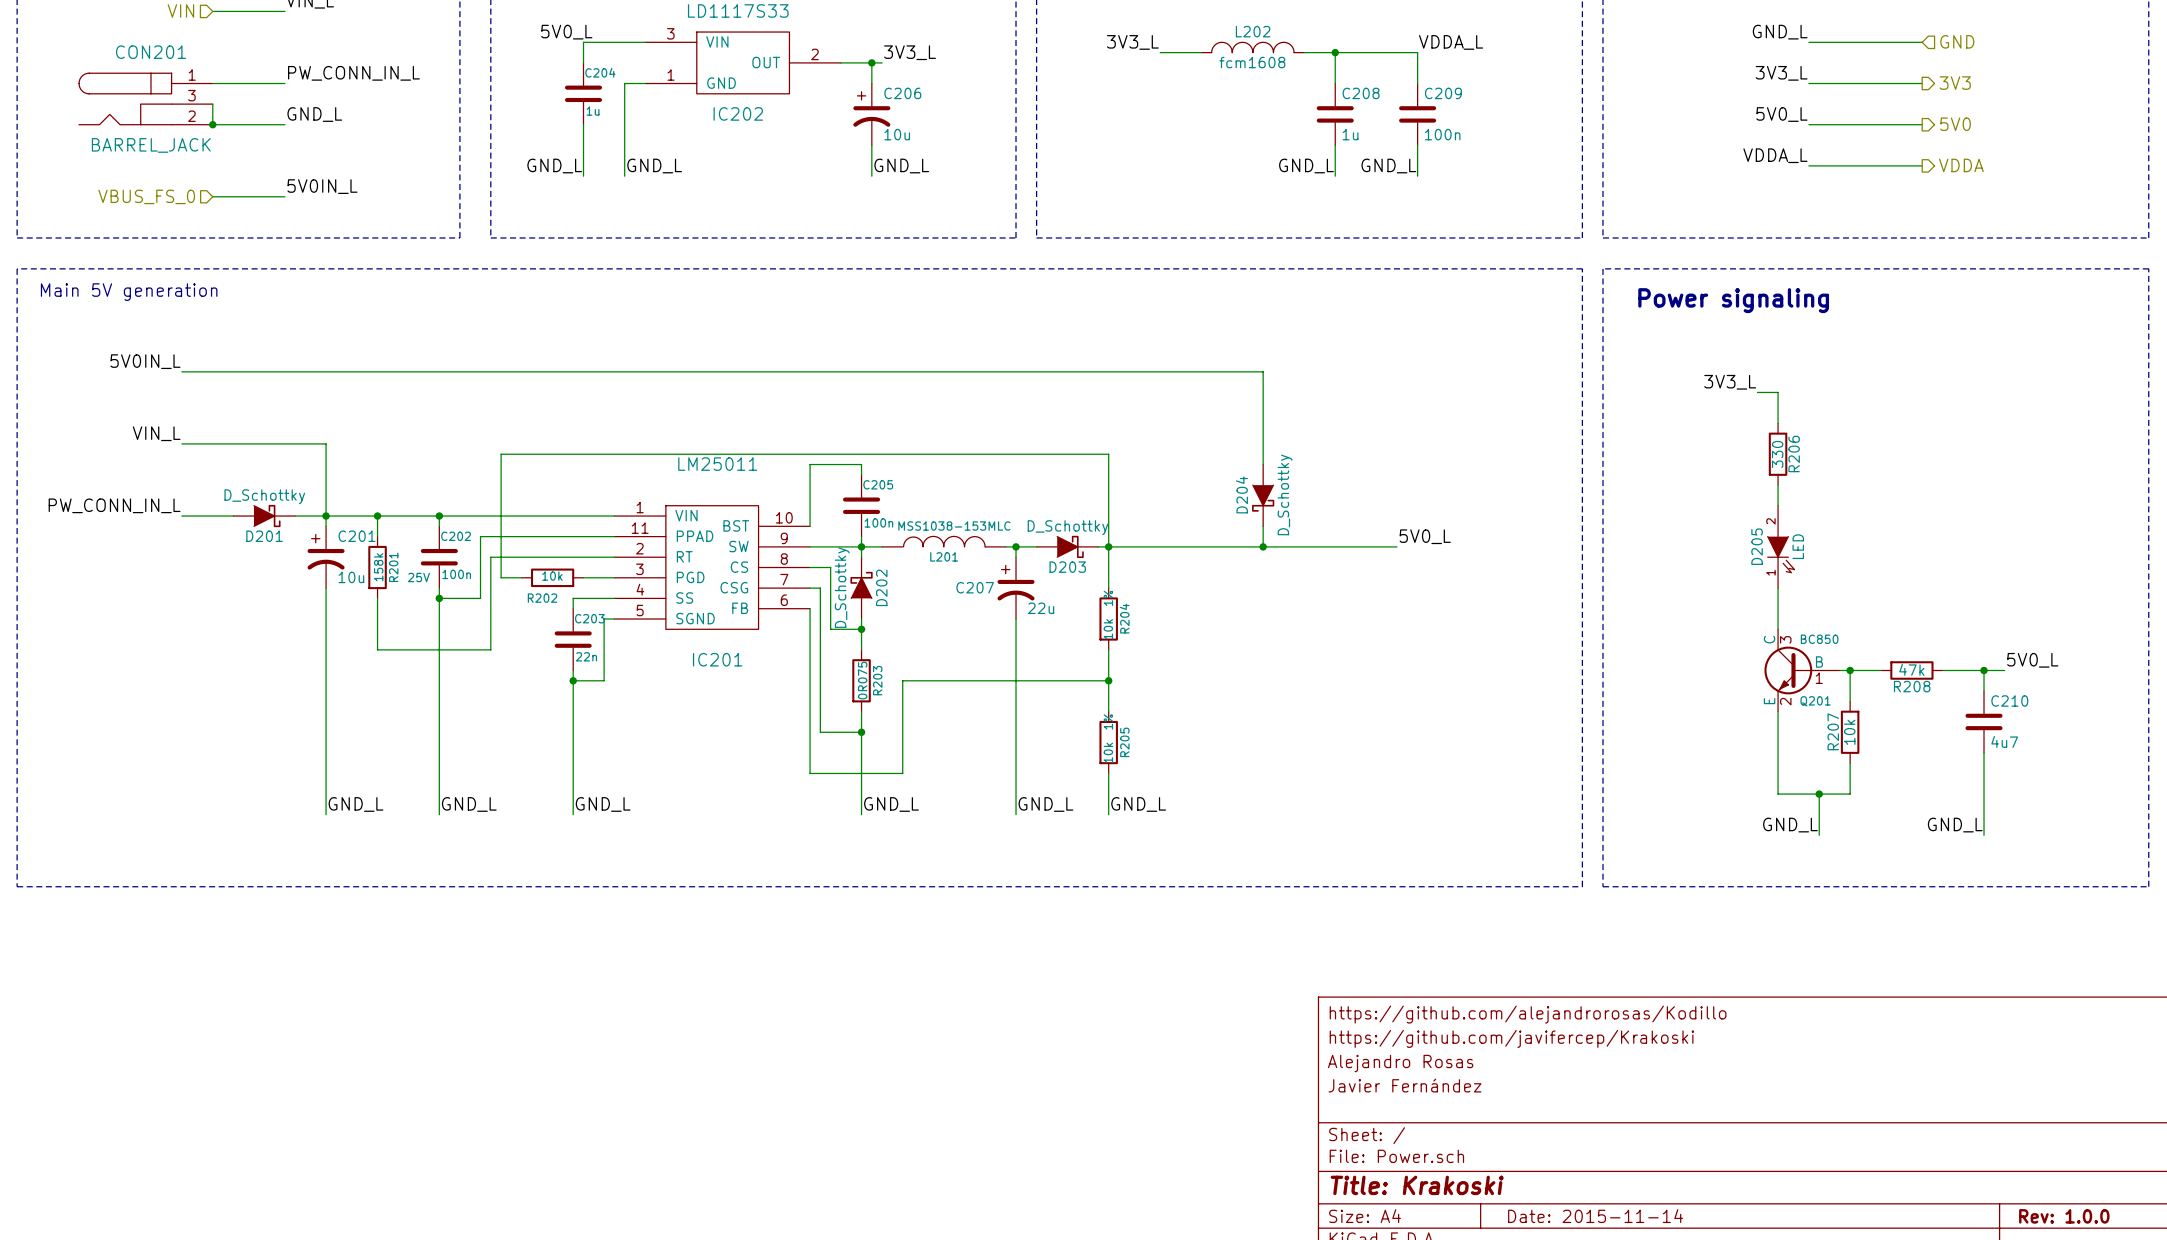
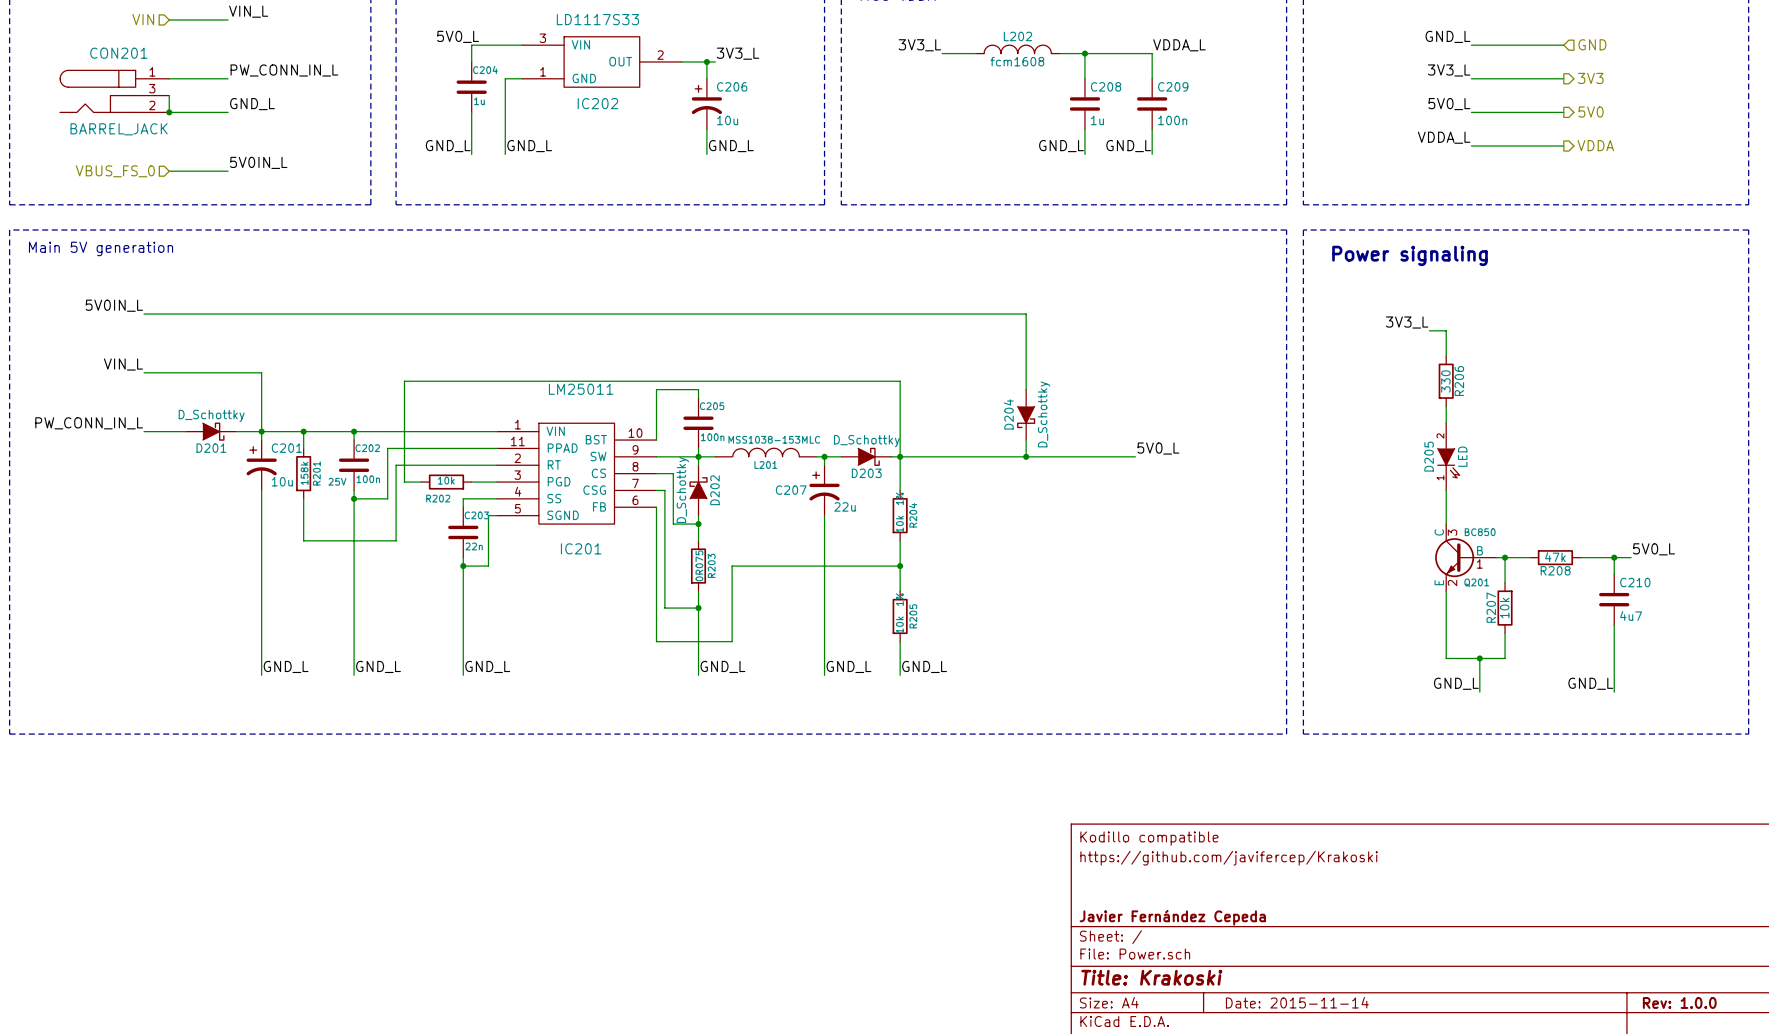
title block: https://github.com/alejandrorosas/Kodillo (1528, 1014) -> Kodillo compatible (1149, 838)
title block: Alejandro Rosas (1400, 1063) -> none
title block: Javier Fernández (1405, 1085) -> Javier Fernández Cepeda (1172, 917)

